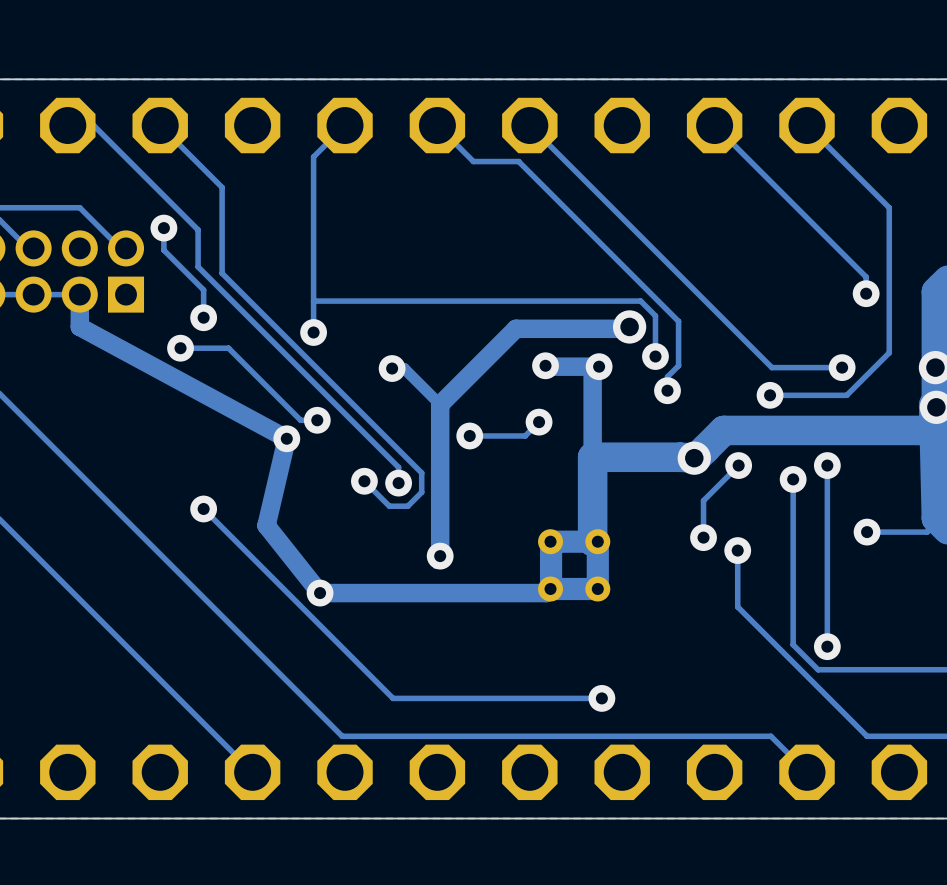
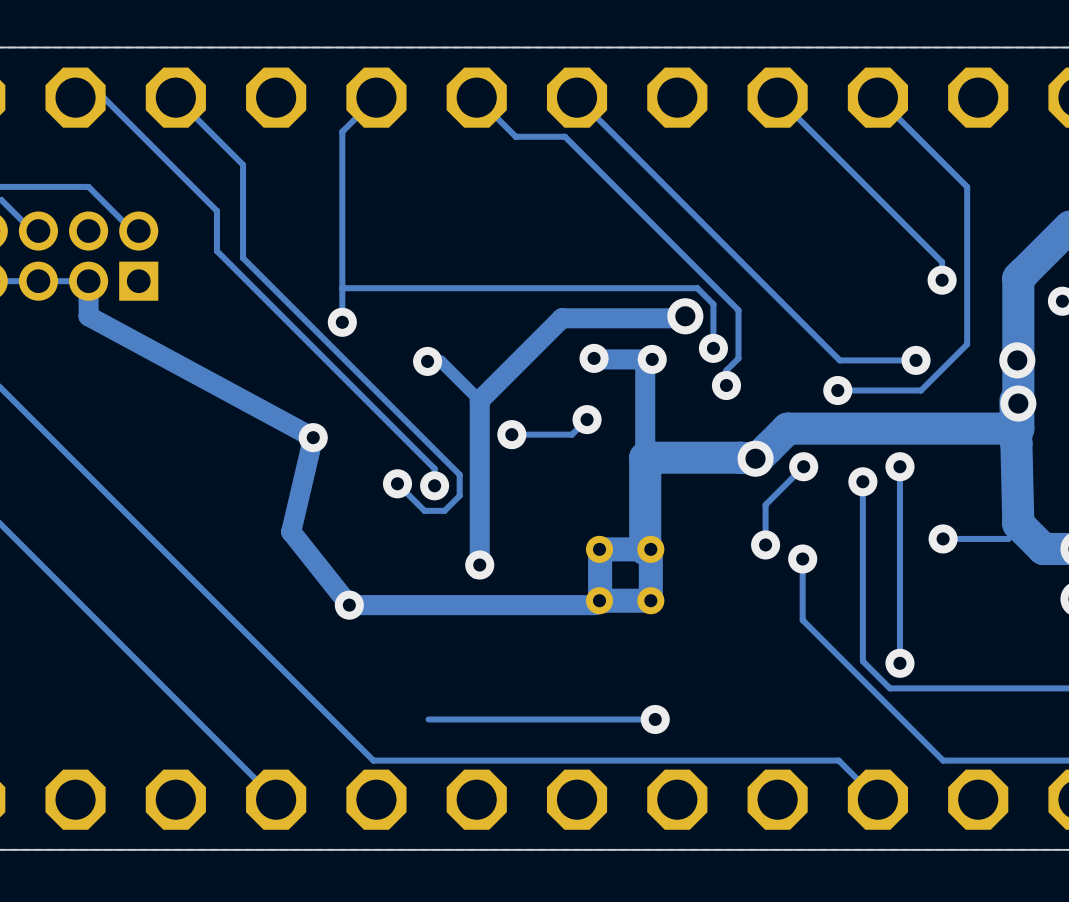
track: (163, 228) (163, 250) (203, 289) (203, 317) -> none
via: (163, 228) -> none
via: (203, 317) -> none
track: (180, 348) (228, 348) (300, 420) (317, 420) -> none
via: (180, 348) -> none
via: (317, 420) -> none
track: (203, 508) (393, 698) -> none
via: (203, 508) -> none

